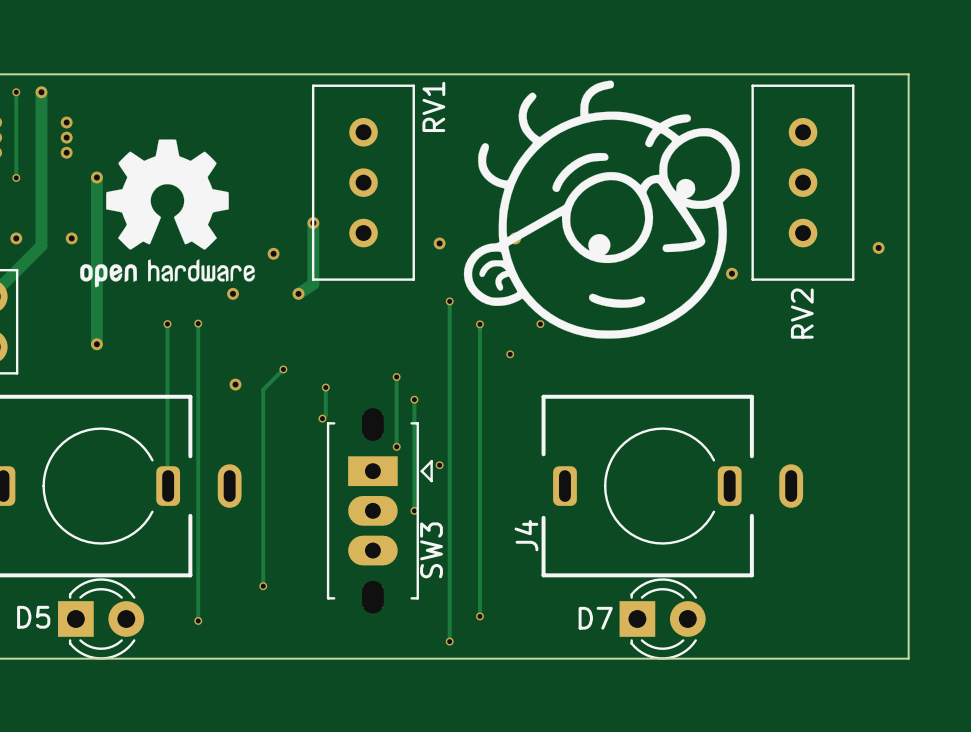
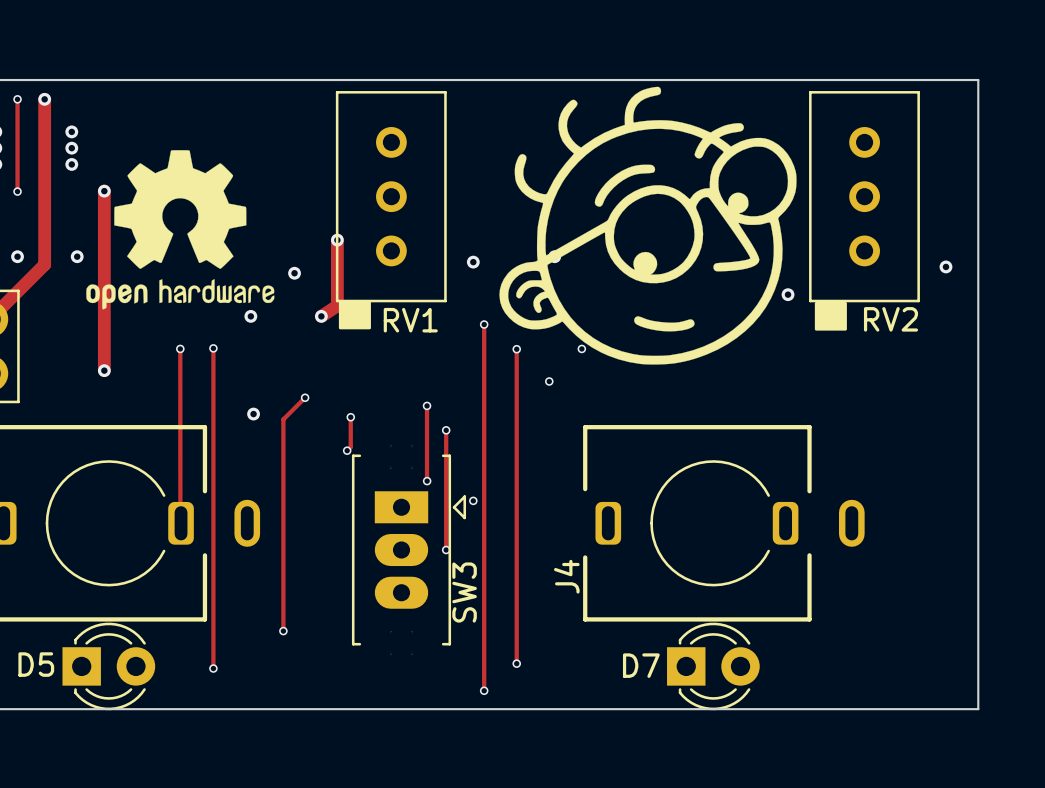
RV1 name rotation: 0° (433, 106) -> 90° clockwise (410, 320)
RV1 name position: RV1 (433, 106) -> RV1 (410, 320)
drawing: none -> [338, 300, 371, 330]
drawing: none -> [814, 301, 847, 331]
RV2 name rotation: 0° (802, 313) -> 90° clockwise (890, 319)

